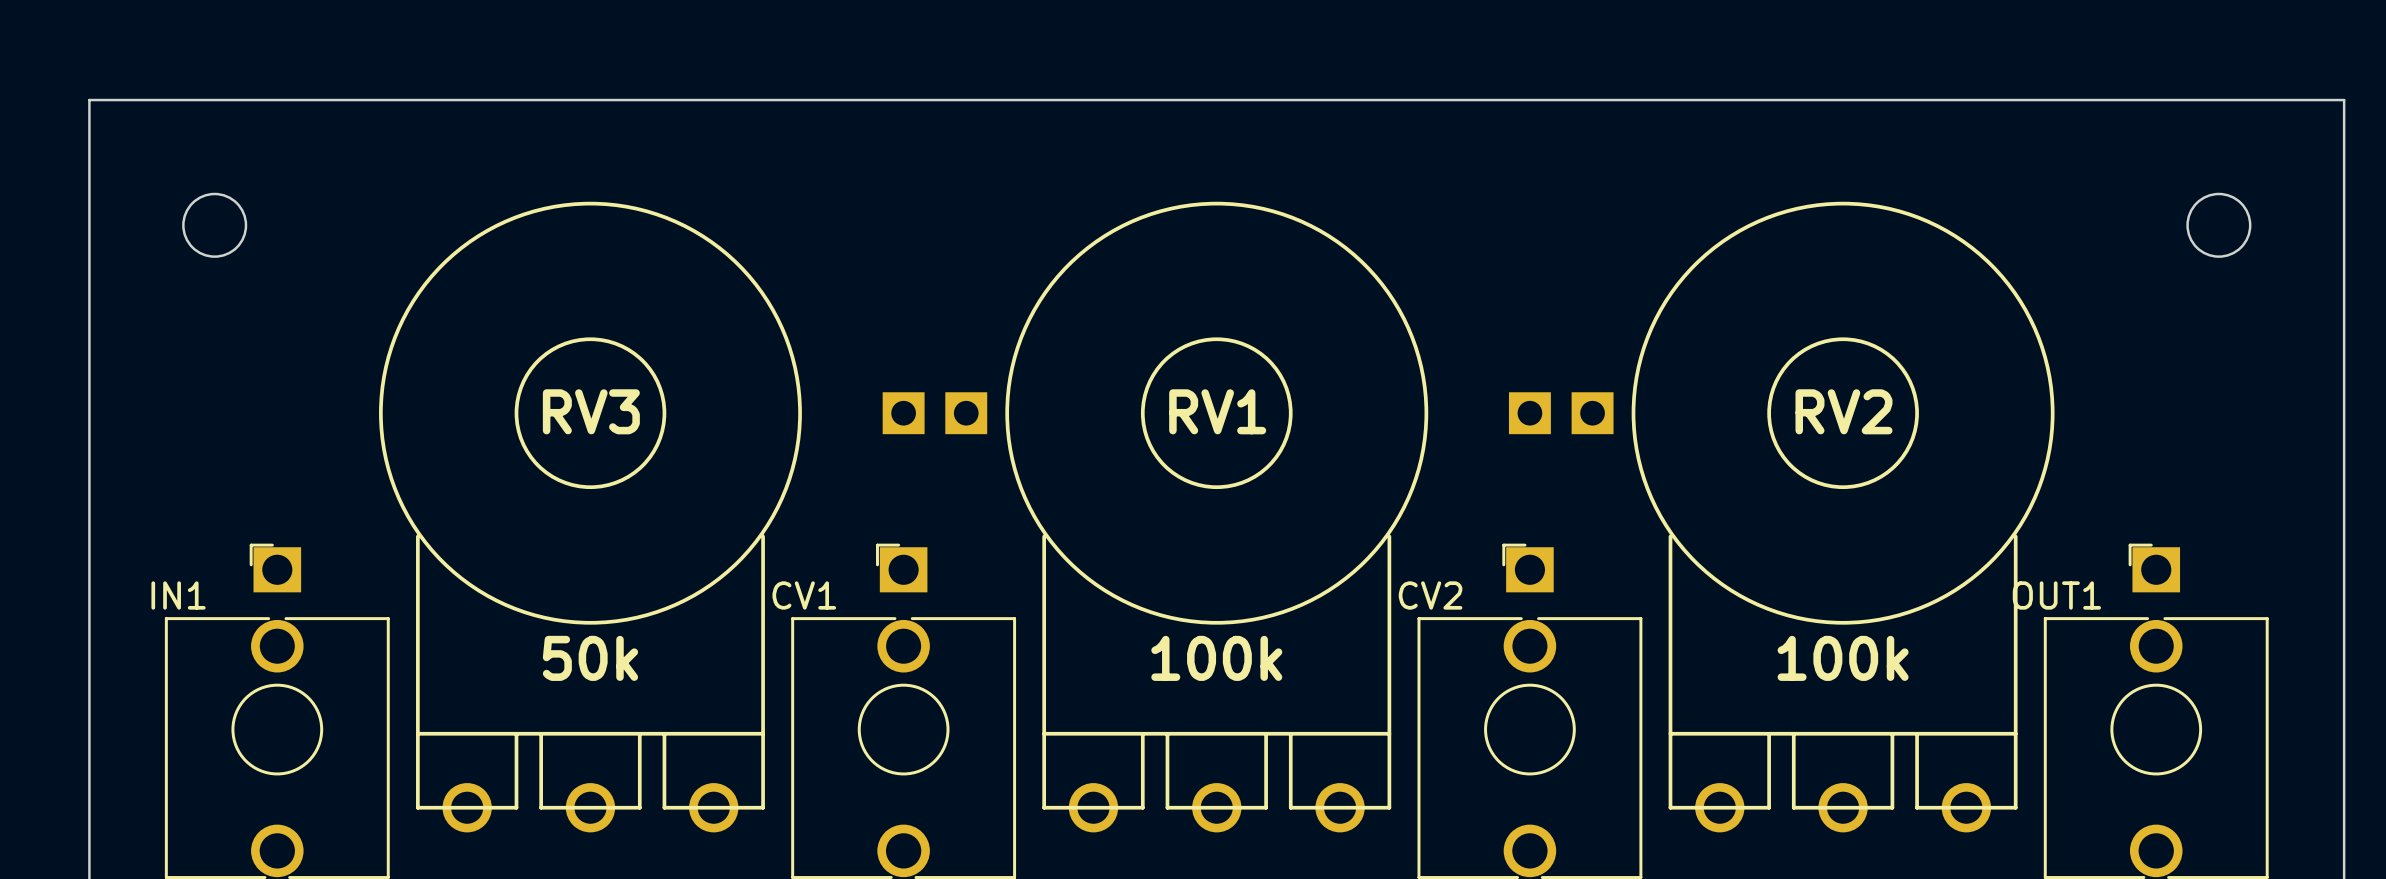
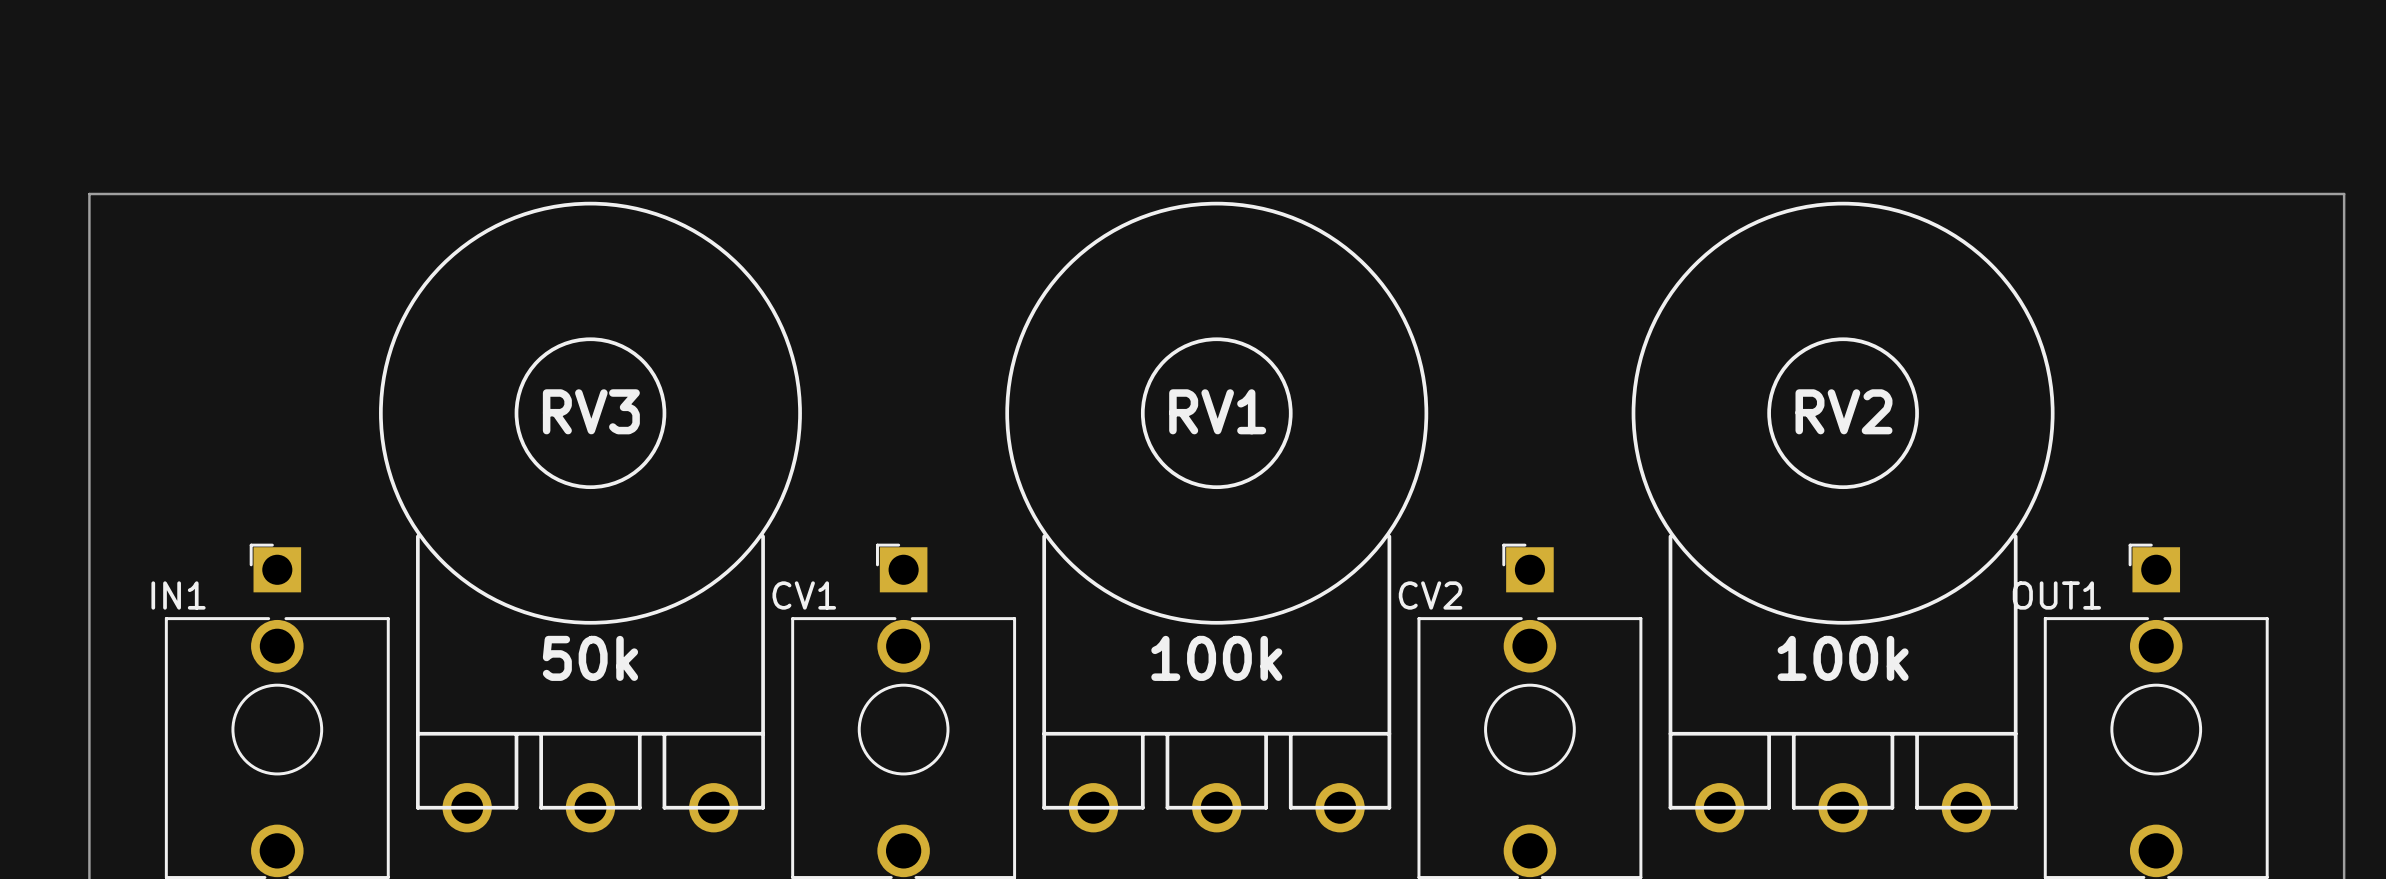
round board edge: [182, 192, 248, 258] -> none
round board edge: [2186, 192, 2252, 258] -> none
board edge: (89, 194) (89, 100) (2344, 100) (2344, 194) -> (89, 194) (2344, 194)
part: (903, 413) -> none
part: (966, 413) -> none
part: (1529, 413) -> none
part: (1592, 413) -> none

